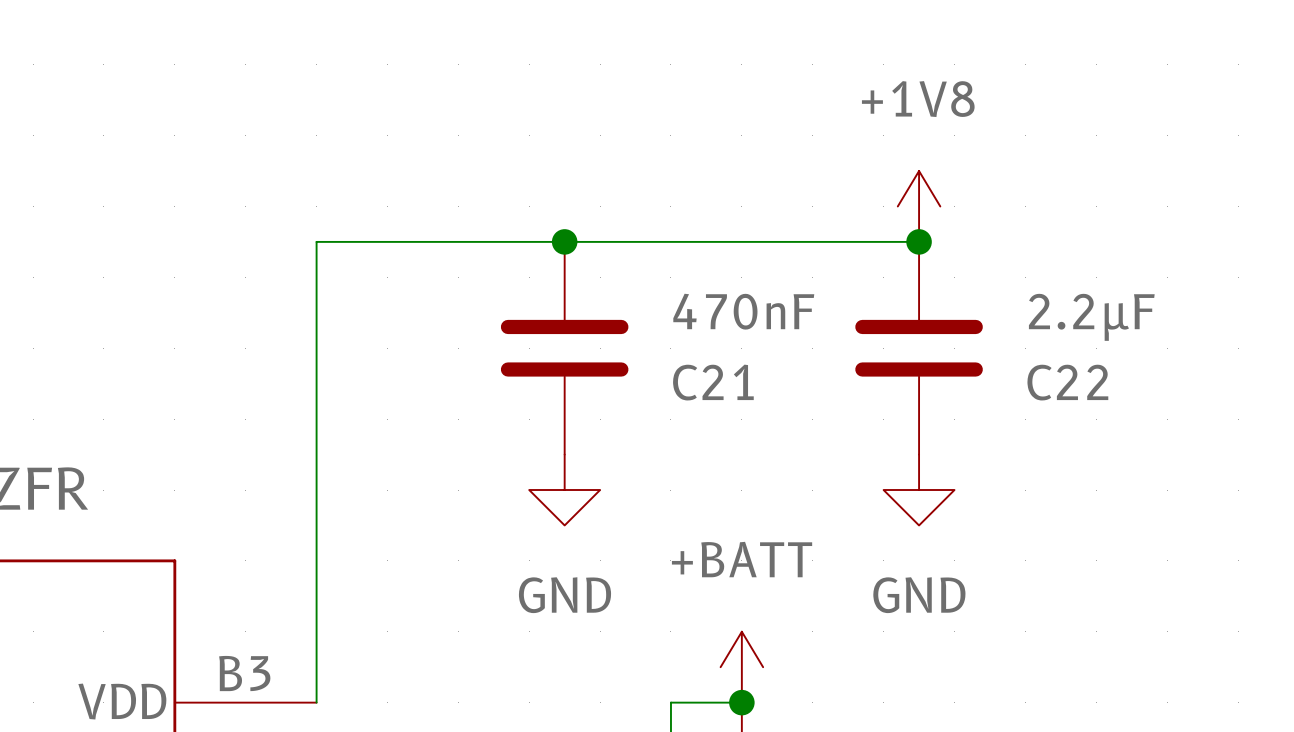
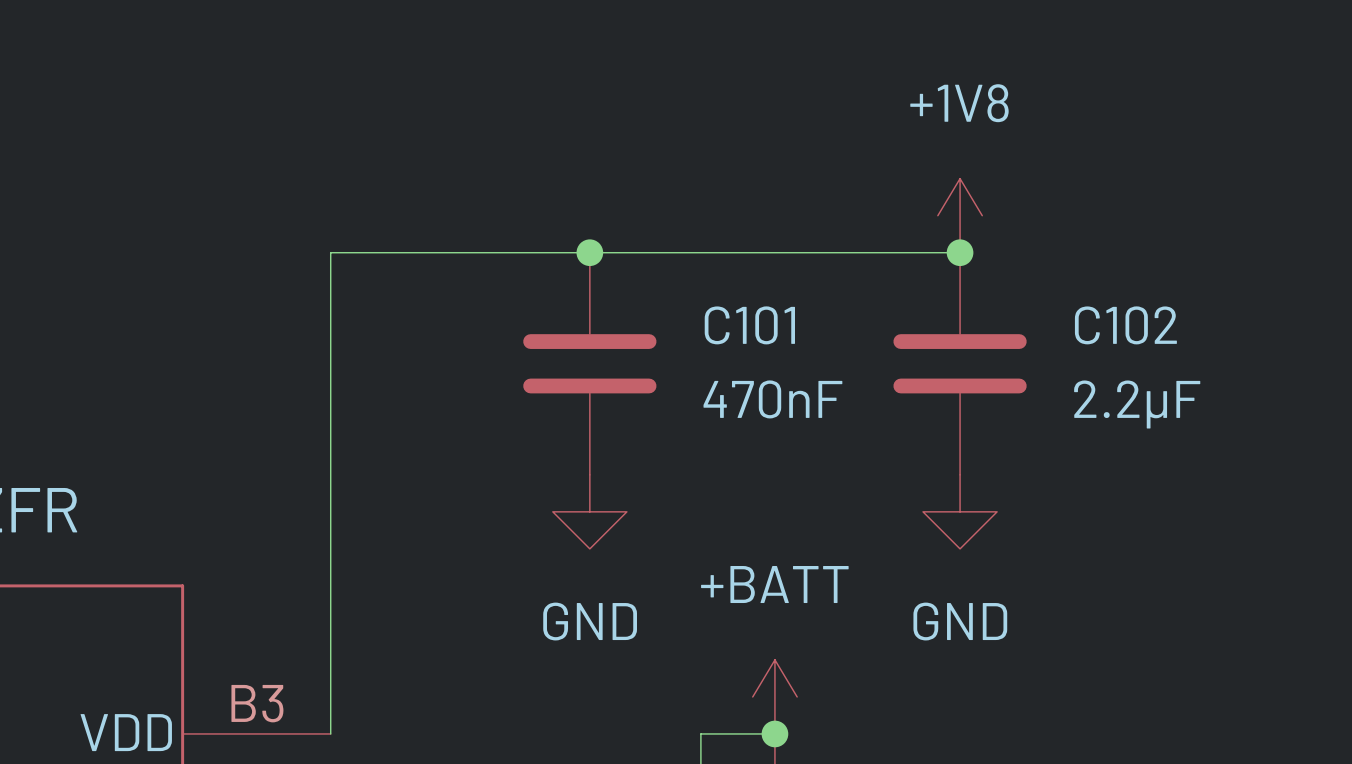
C21 value position: 470nF (743, 311) -> 470nF (772, 399)
C22 value position: 2.2µF (1091, 317) -> 2.2µF (1137, 404)
C21 name: C21 (713, 382) -> C101 (749, 325)
C22 name: C22 (1067, 382) -> C102 (1125, 325)

